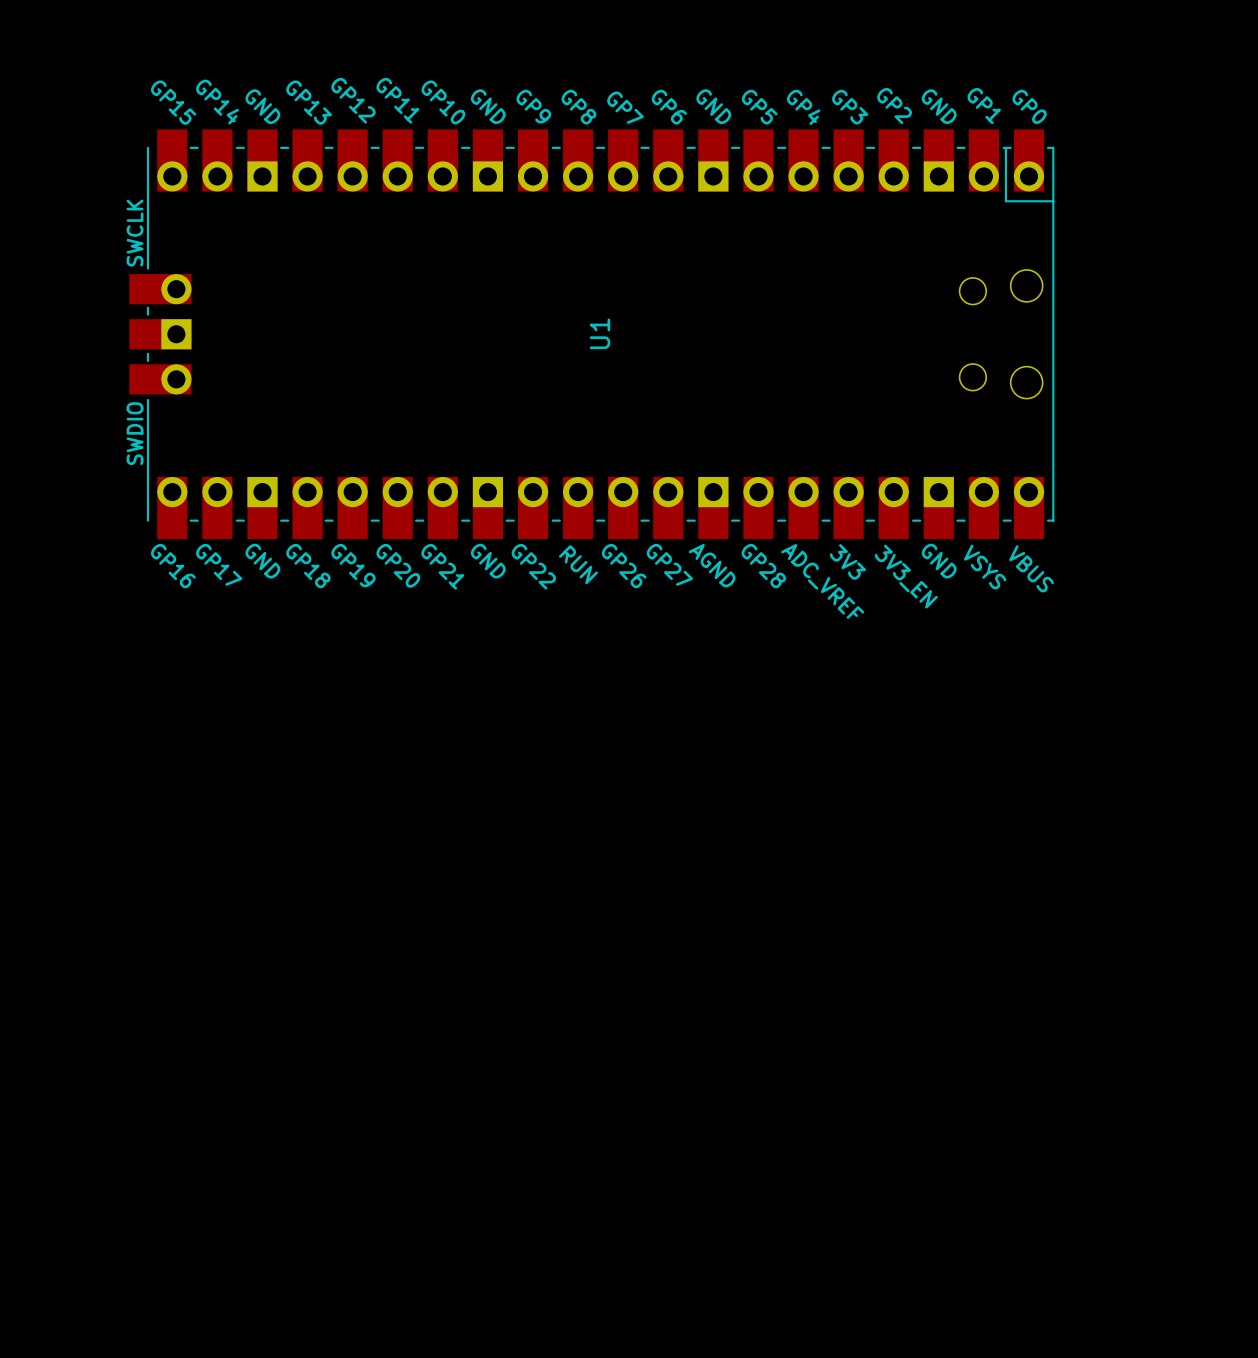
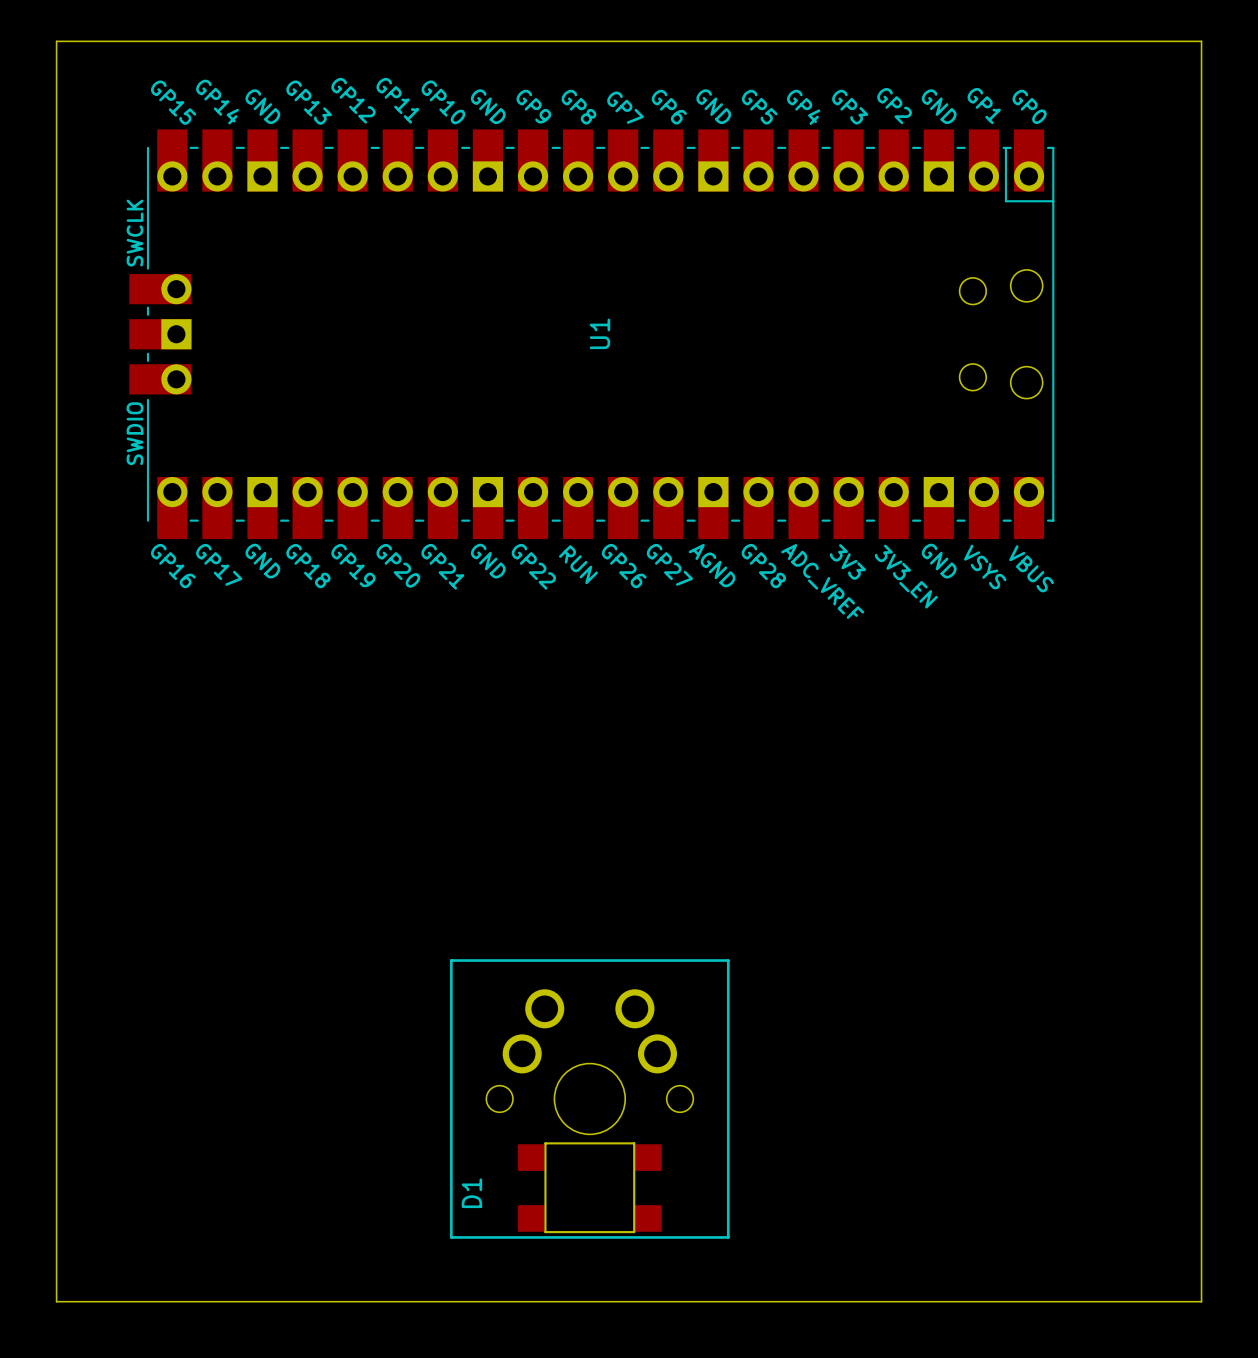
board edge: none -> (56, 41) (1201, 41) (1201, 1301) (56, 1301) (56, 41)
D1: none -> (589, 1098)

